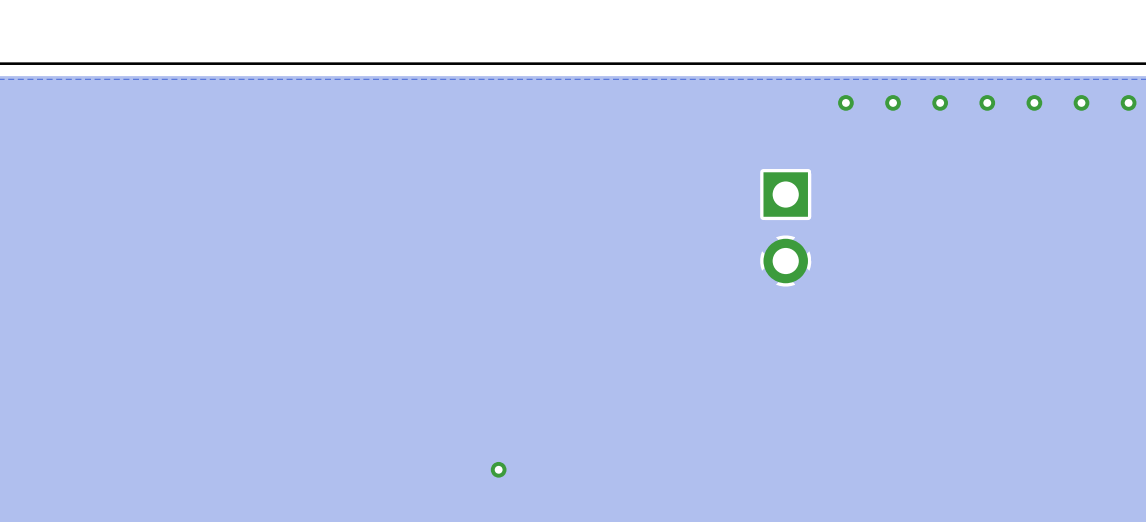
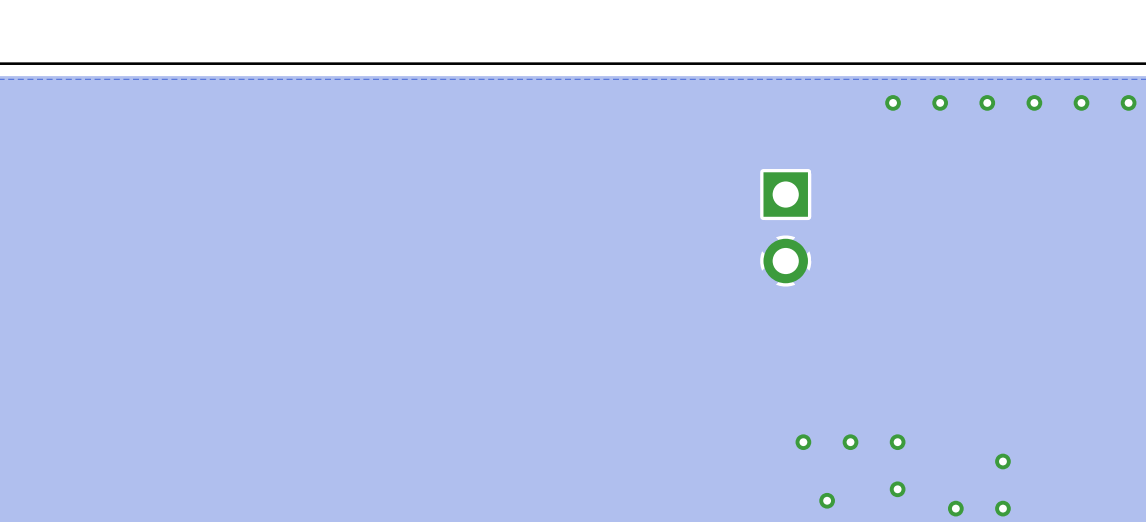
via: (845, 102) -> none
via: none -> (803, 442)
via: none -> (850, 442)
via: none -> (897, 442)
via: none -> (1002, 461)
via: (498, 469) -> none
via: none -> (897, 489)
via: none -> (827, 500)
via: none -> (955, 508)
via: none -> (1002, 508)

